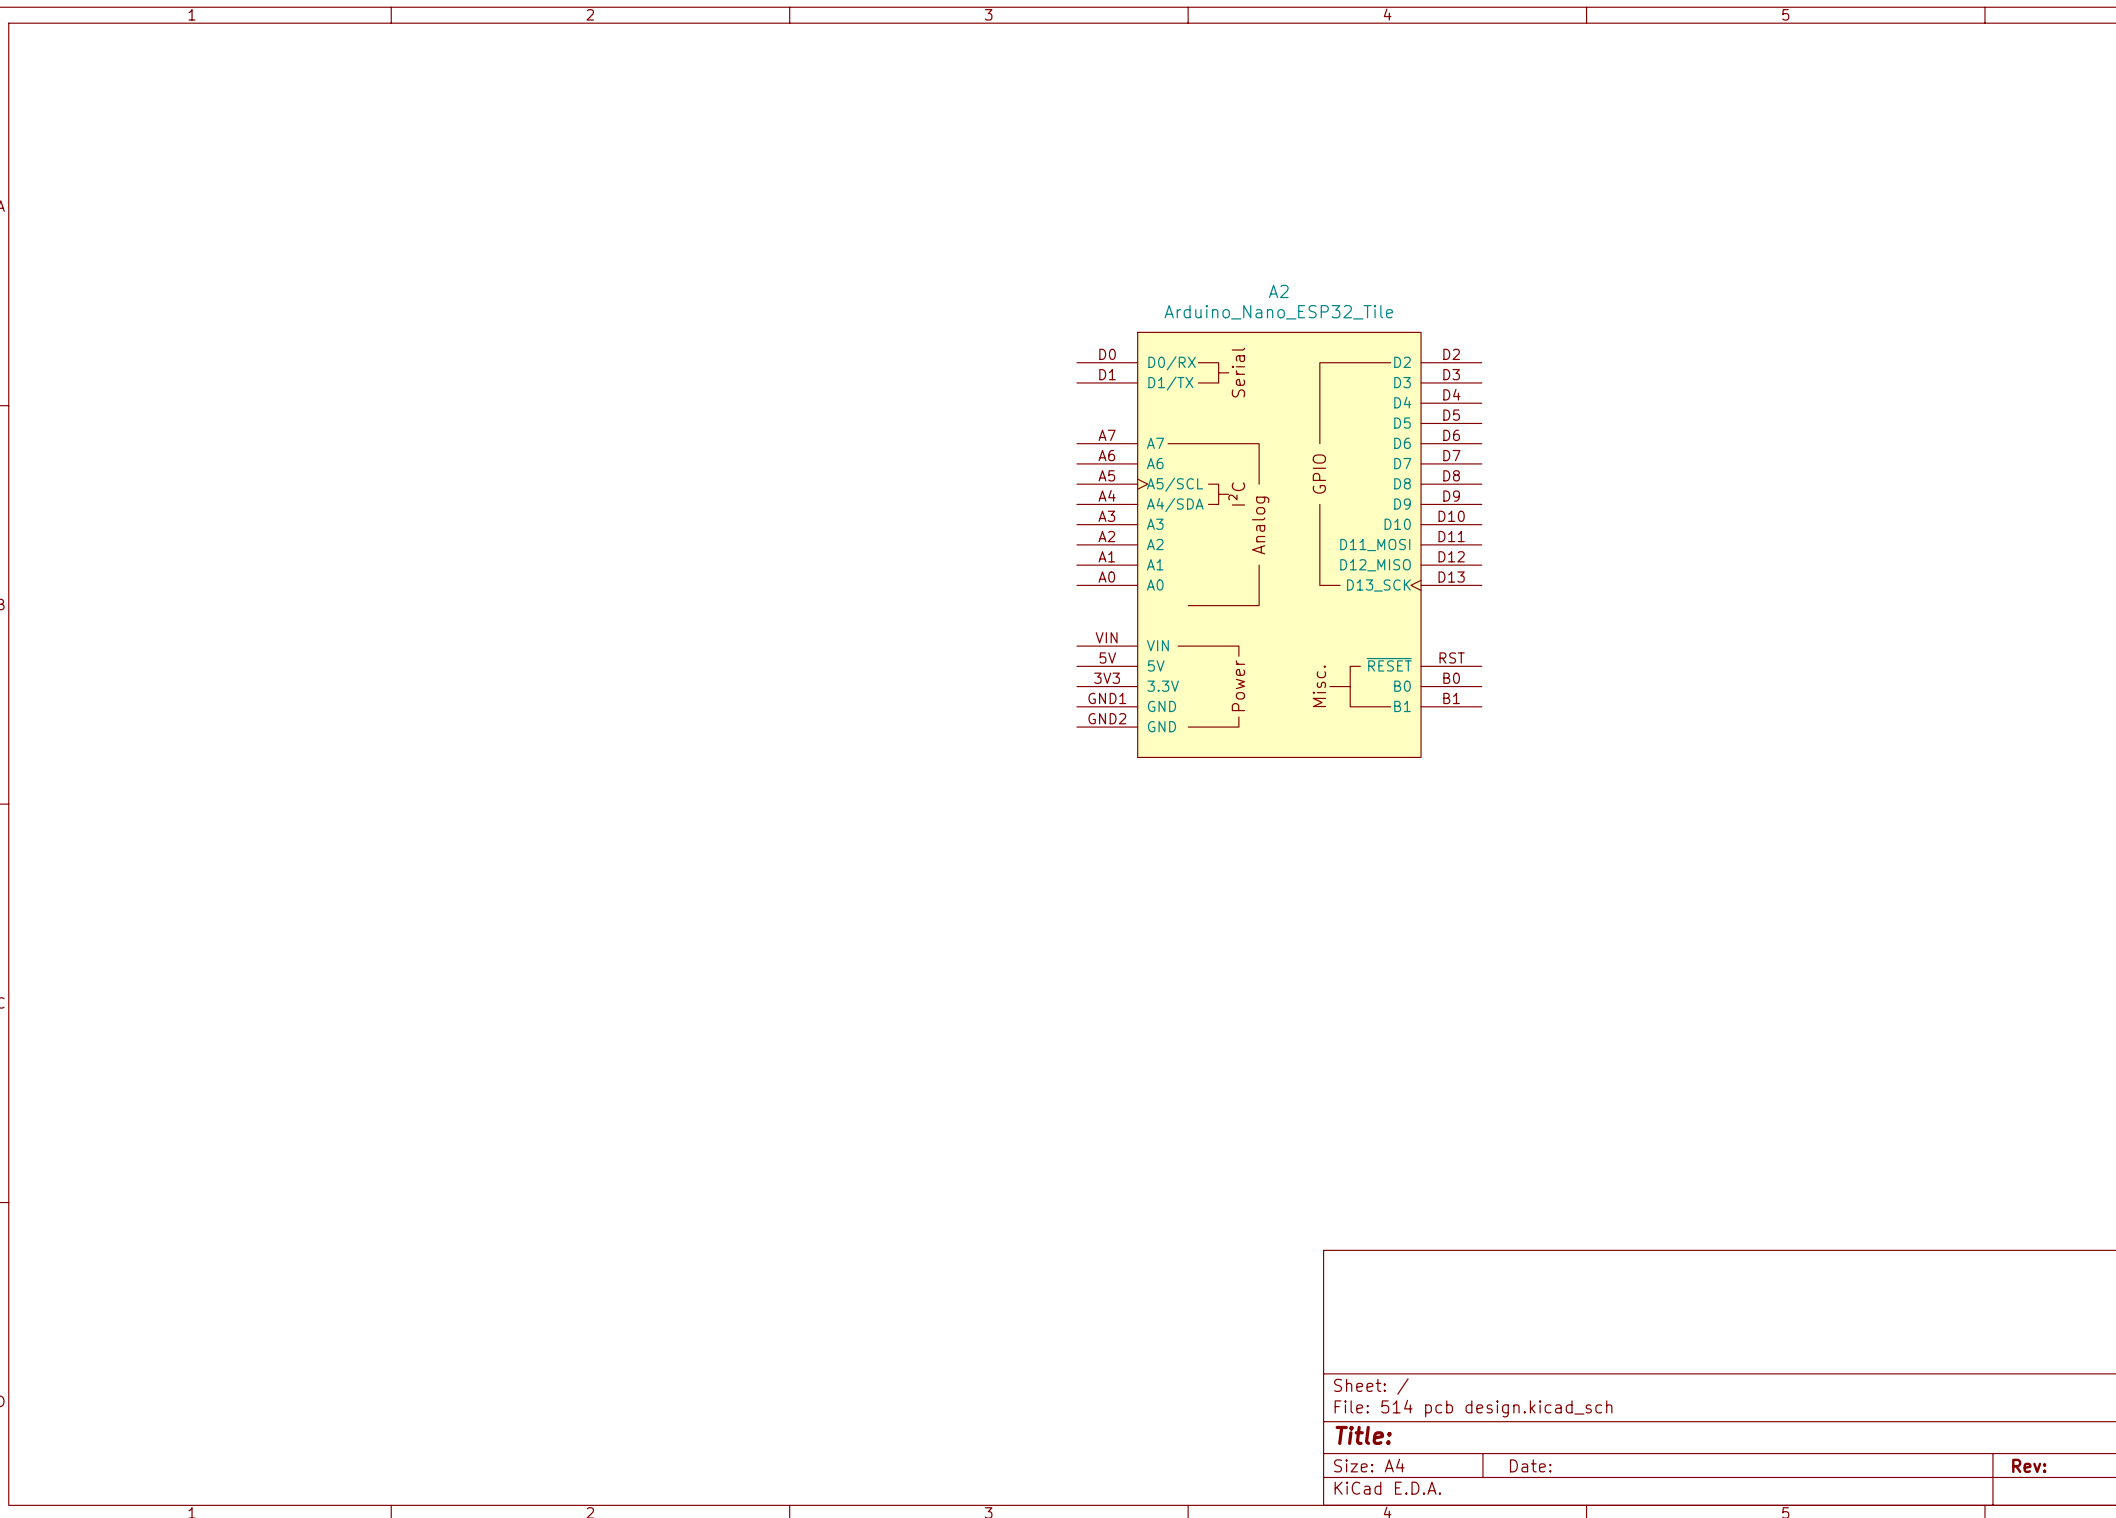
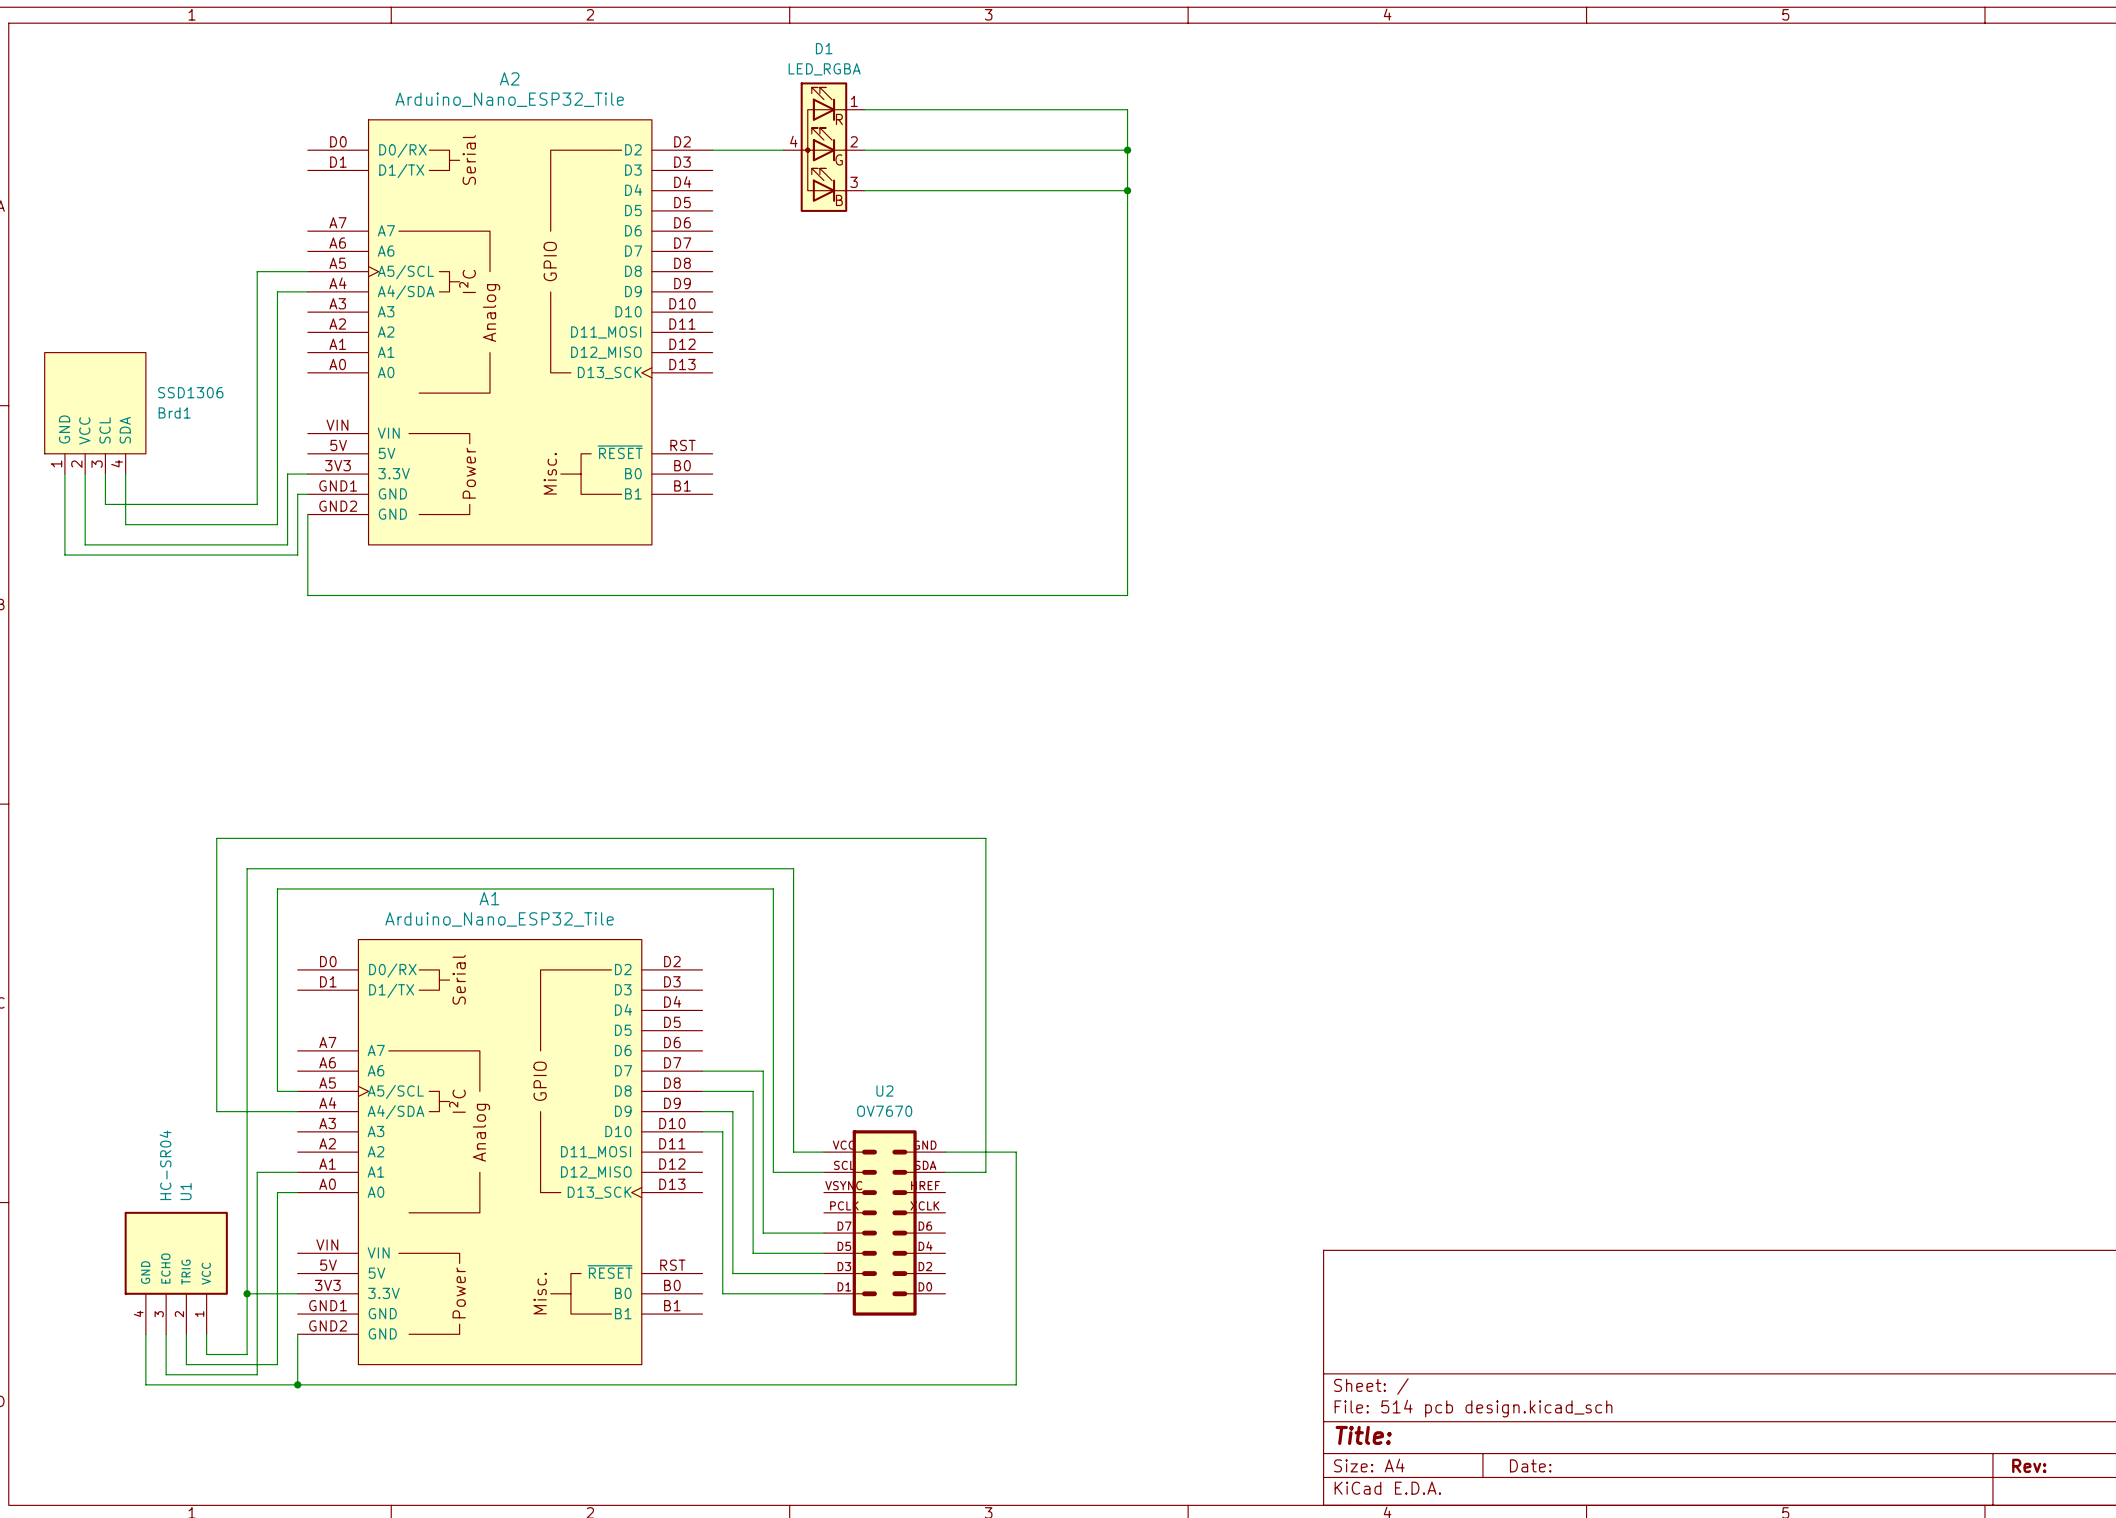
wire: none -> (864, 109) (1127, 109) (1127, 595) (307, 595) (307, 514)
D1: none -> LED_RGBA (823, 147)
wire: none -> (712, 150) (783, 150)
wire: none -> (864, 150) (1127, 150)
junction: none -> (1127, 150)
wire: none -> (864, 190) (1127, 190)
junction: none -> (1127, 190)
wire: none -> (307, 271) (257, 271) (257, 504) (105, 504) (105, 474)
wire: none -> (307, 291) (277, 291) (277, 524) (125, 524) (125, 474)
Brd1: none -> SSD1306 (95, 413)
wire: none -> (64, 474) (64, 555) (297, 555) (297, 494) (307, 494)
wire: none -> (85, 474) (85, 544) (287, 544) (287, 474) (307, 474)
A2 position: (1279, 544) -> (510, 332)
wire: none -> (702, 1071) (763, 1071) (763, 1233) (823, 1233)
wire: none -> (297, 1091) (277, 1091) (277, 888) (773, 888) (773, 1172) (823, 1172)
wire: none -> (702, 1091) (753, 1091) (753, 1253) (823, 1253)
wire: none -> (297, 1111) (216, 1111) (216, 838) (985, 838) (985, 1172) (945, 1172)
wire: none -> (702, 1111) (732, 1111) (732, 1273) (823, 1273)
wire: none -> (702, 1131) (722, 1131) (722, 1293) (823, 1293)
A1: none -> Arduino_Nano_ESP32_Tile (500, 1152)
wire: none -> (823, 1152) (793, 1152) (793, 868) (247, 868) (247, 1354) (206, 1354) (206, 1334)
wire: none -> (945, 1152) (1016, 1152) (1016, 1384) (145, 1384) (145, 1334)
wire: none -> (297, 1172) (257, 1172) (257, 1374) (166, 1374) (166, 1334)
wire: none -> (297, 1192) (277, 1192) (277, 1364) (186, 1364) (186, 1334)
U2: none -> OV7670 (884, 1222)
U1: none -> HC-SR04 (176, 1273)
wire: none -> (247, 1293) (297, 1293)
junction: none -> (247, 1293)
wire: none -> (297, 1334) (297, 1384)
junction: none -> (297, 1384)

